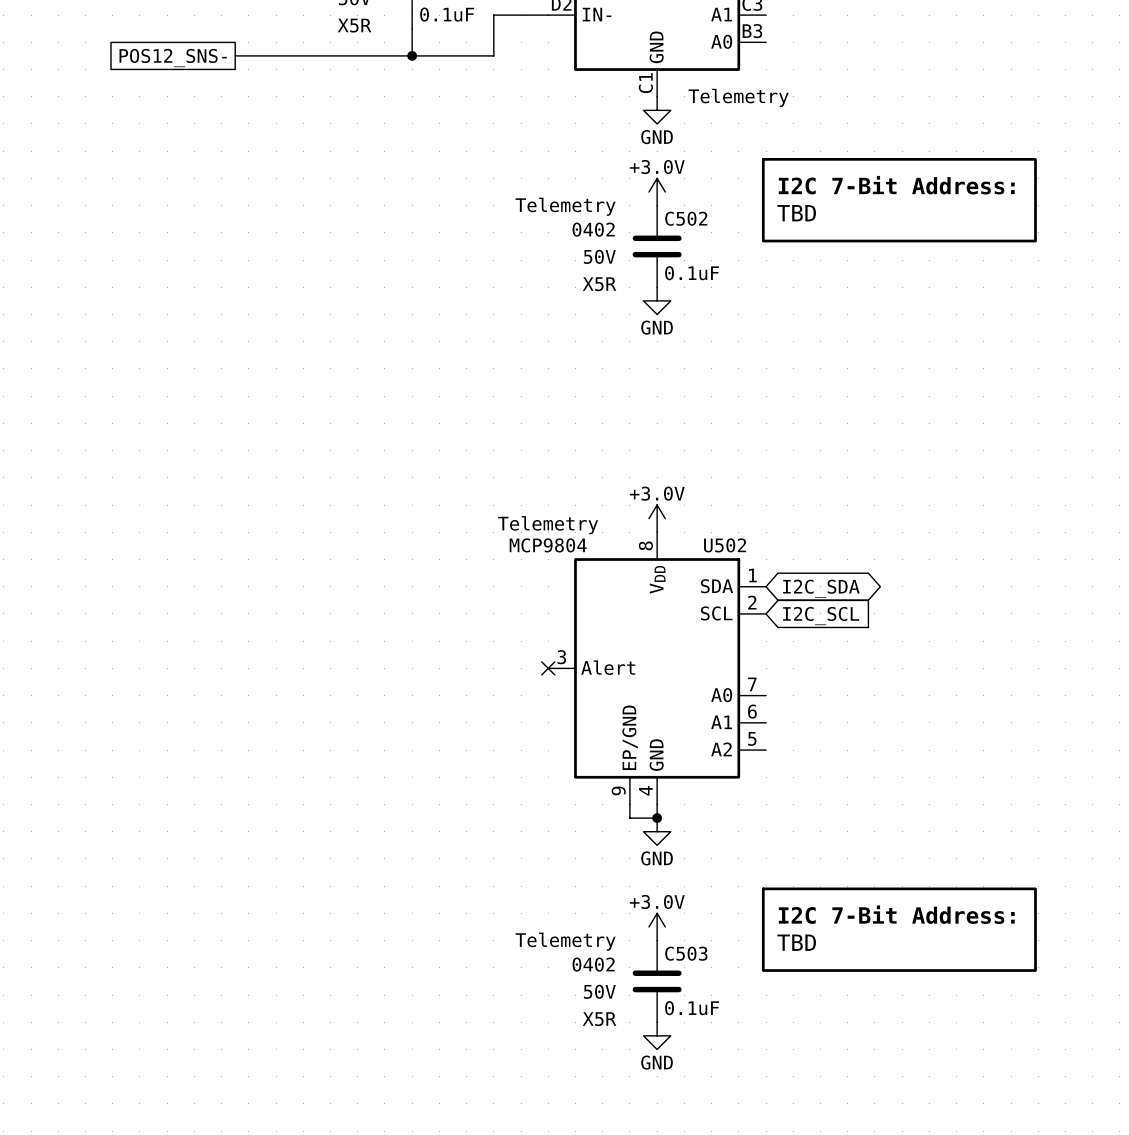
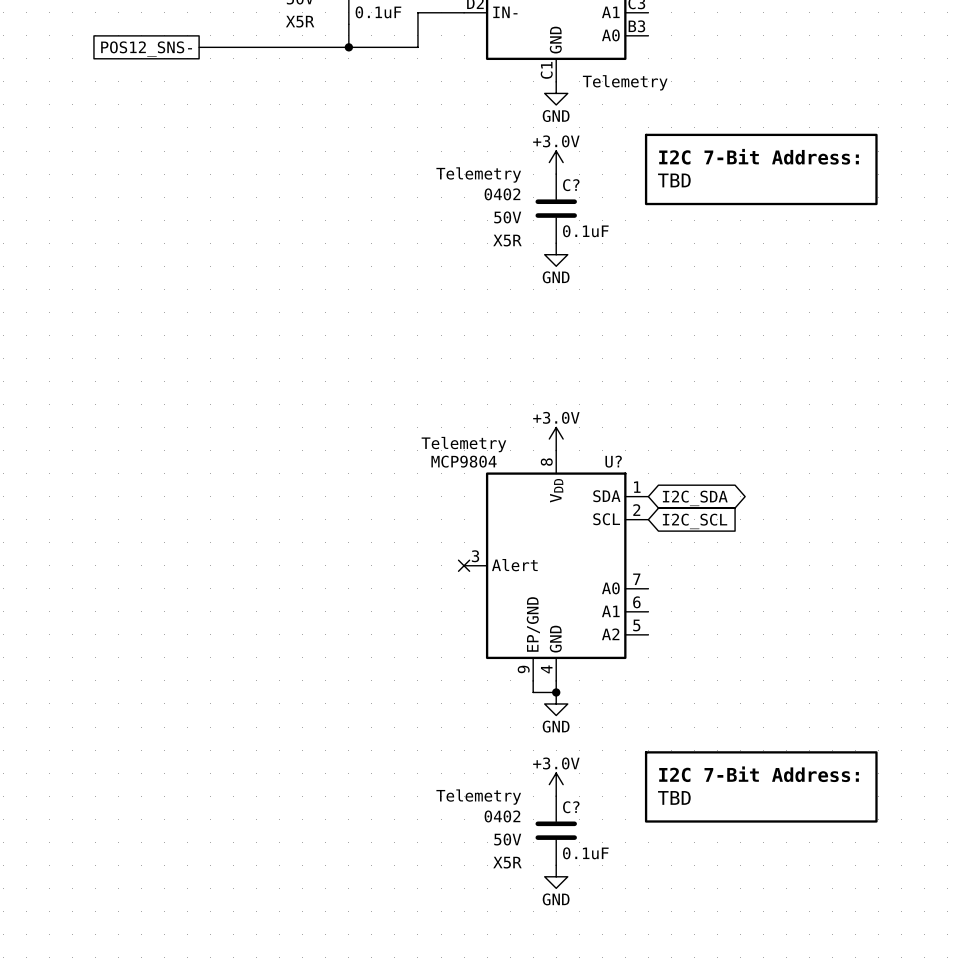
C502 name: C502 (686, 218) -> C? (571, 185)
U502 name: U502 (725, 545) -> U? (613, 461)
C503 name: C503 (686, 953) -> C? (571, 807)

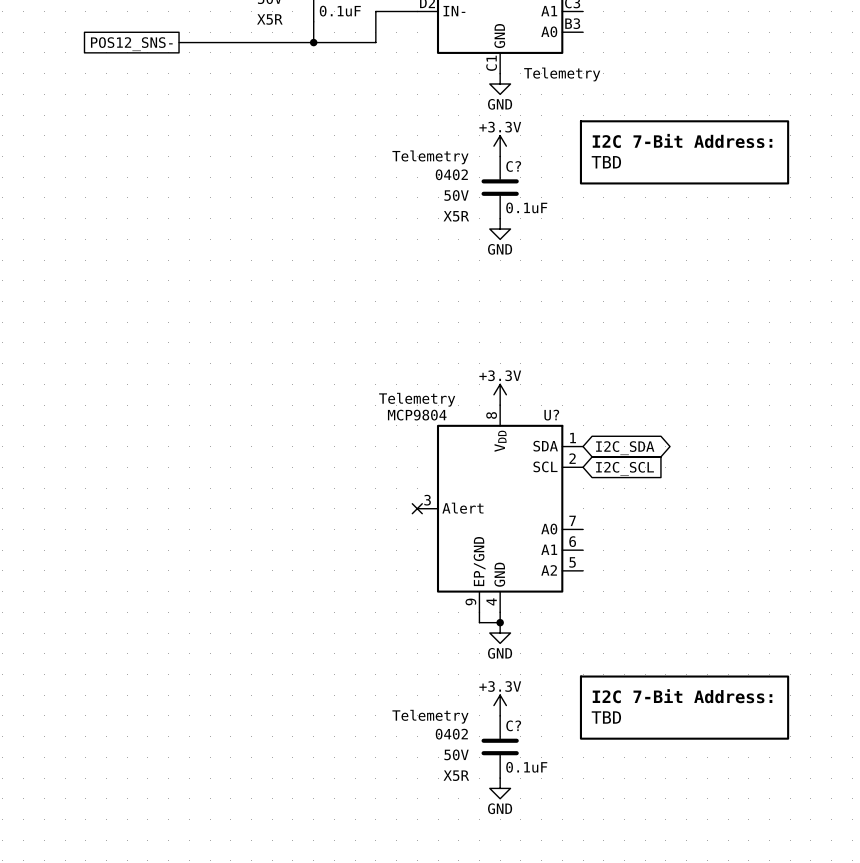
power symbol: +3.0V (556, 162) -> +3.3V (500, 146)
power symbol: +3.0V (556, 439) -> +3.3V (500, 394)
power symbol: +3.0V (556, 784) -> +3.3V (500, 705)

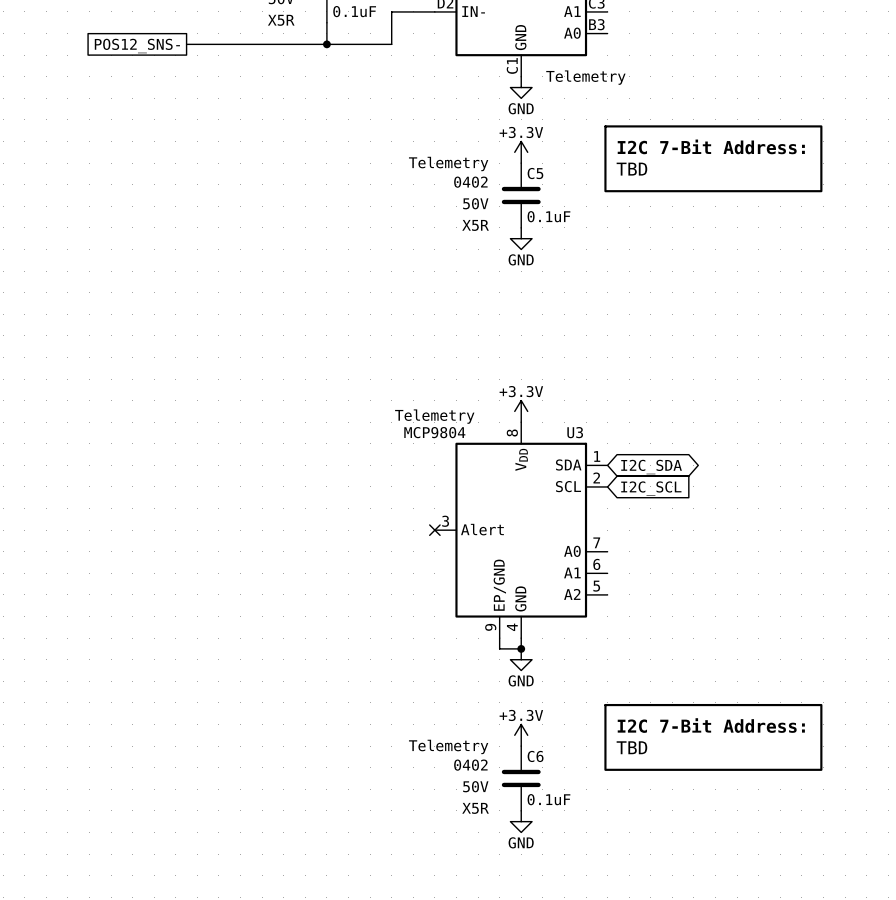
C? name: C? (513, 166) -> C5 (535, 173)
U? name: U? (551, 415) -> U3 (575, 432)
C? name: C? (513, 725) -> C6 (535, 756)

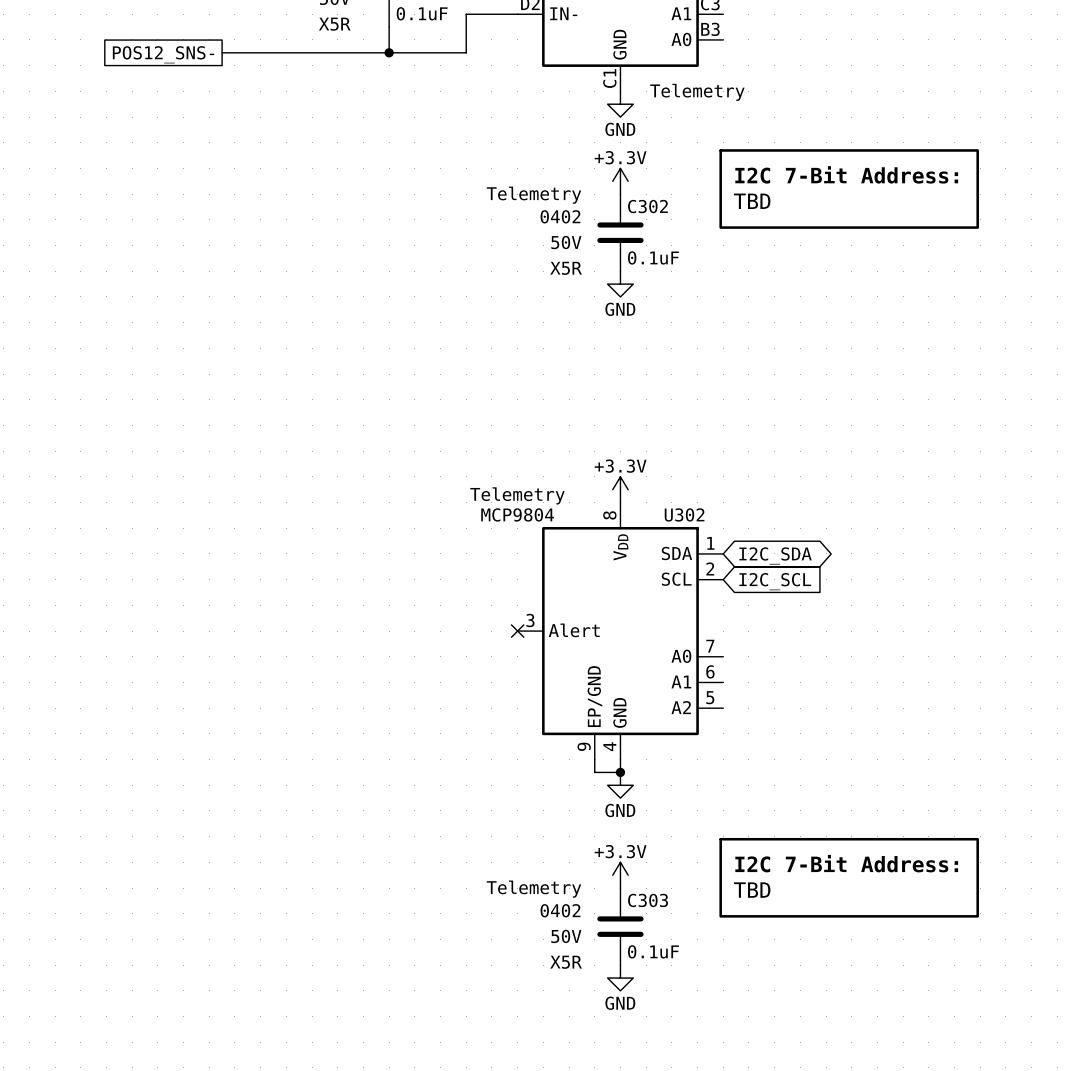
C5 name: C5 (535, 173) -> C302 (647, 206)
U3 name: U3 (575, 432) -> U302 (684, 514)
C6 name: C6 (535, 756) -> C303 (648, 900)

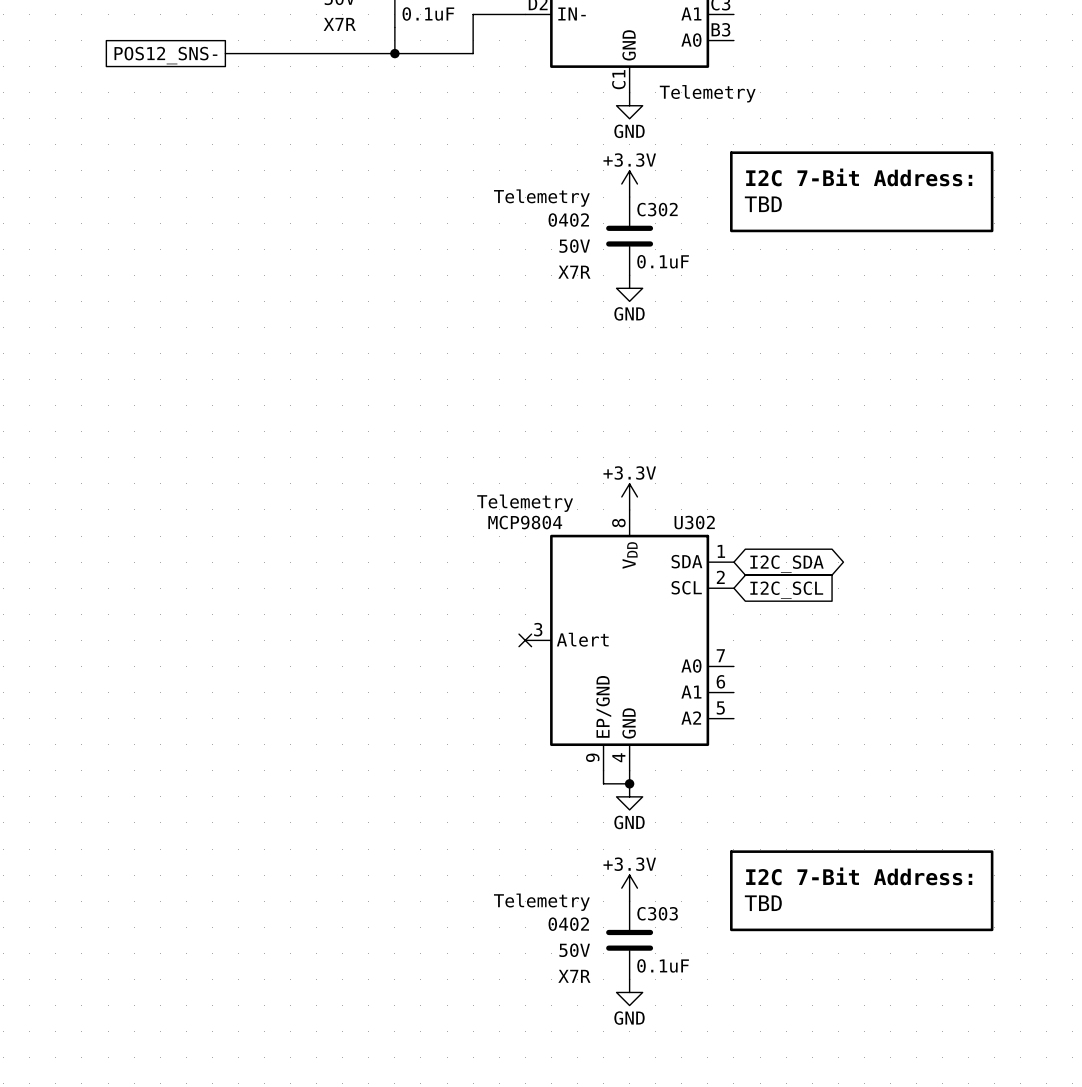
part text: X5R (334, 24) -> X7R (339, 24)
C302 text: X5R (566, 268) -> X7R (574, 272)
C303 text: X5R (566, 962) -> X7R (574, 976)

